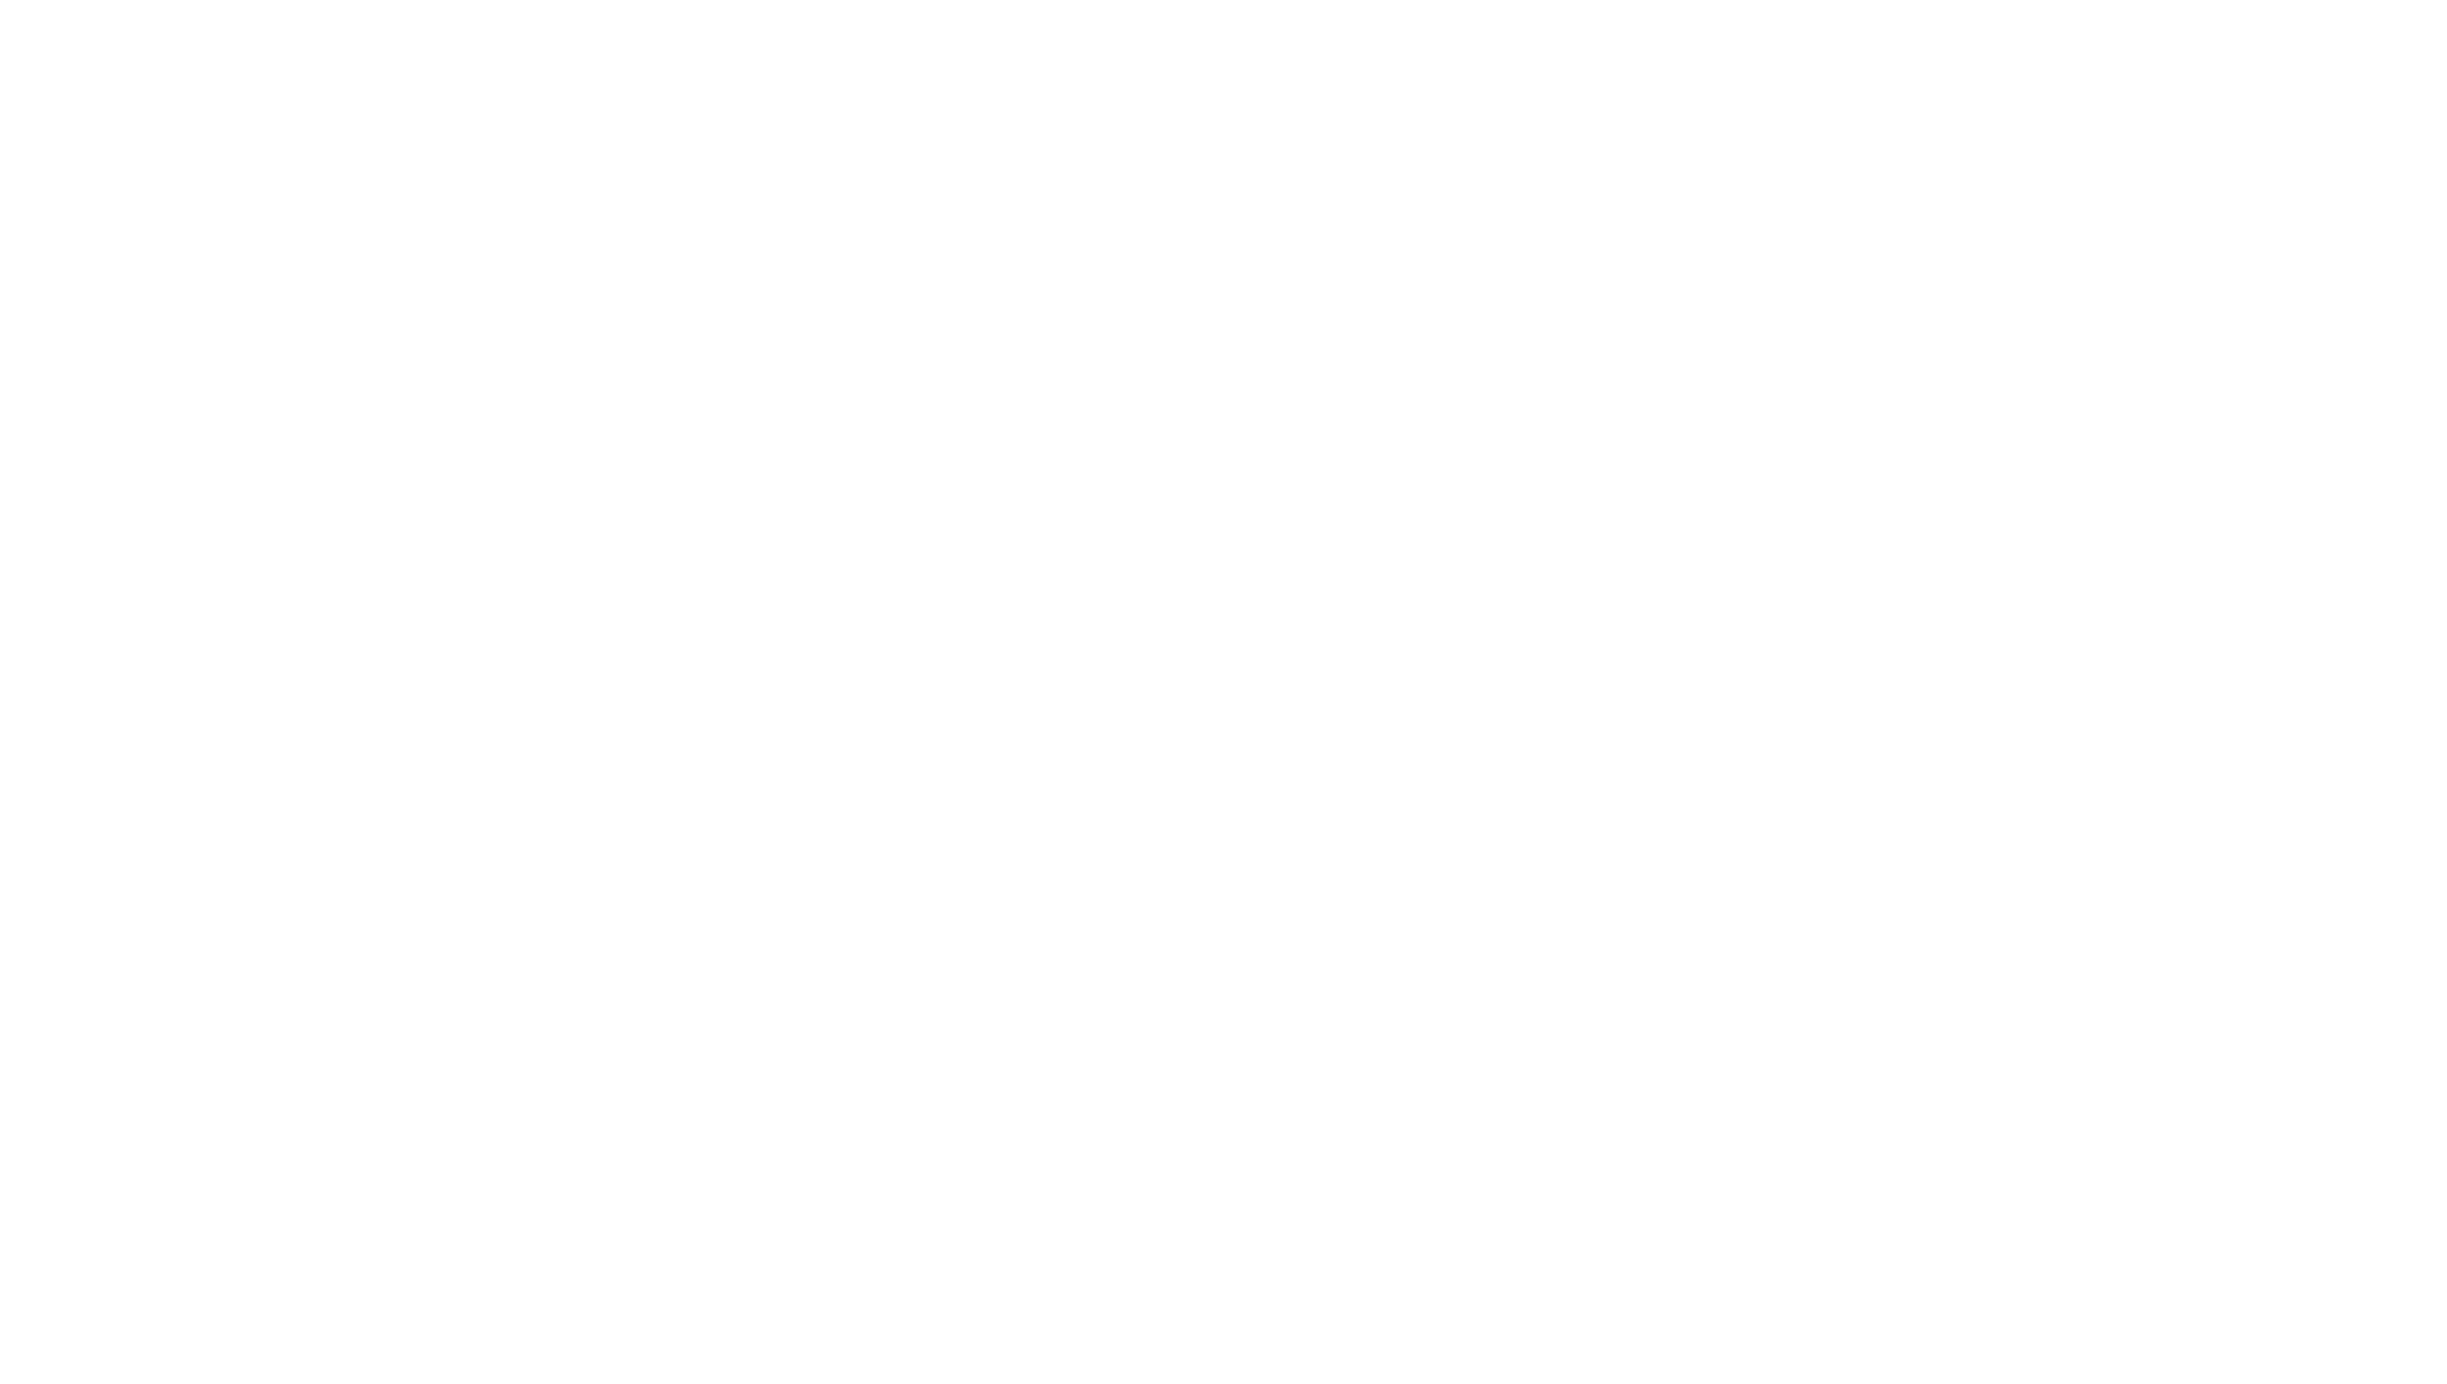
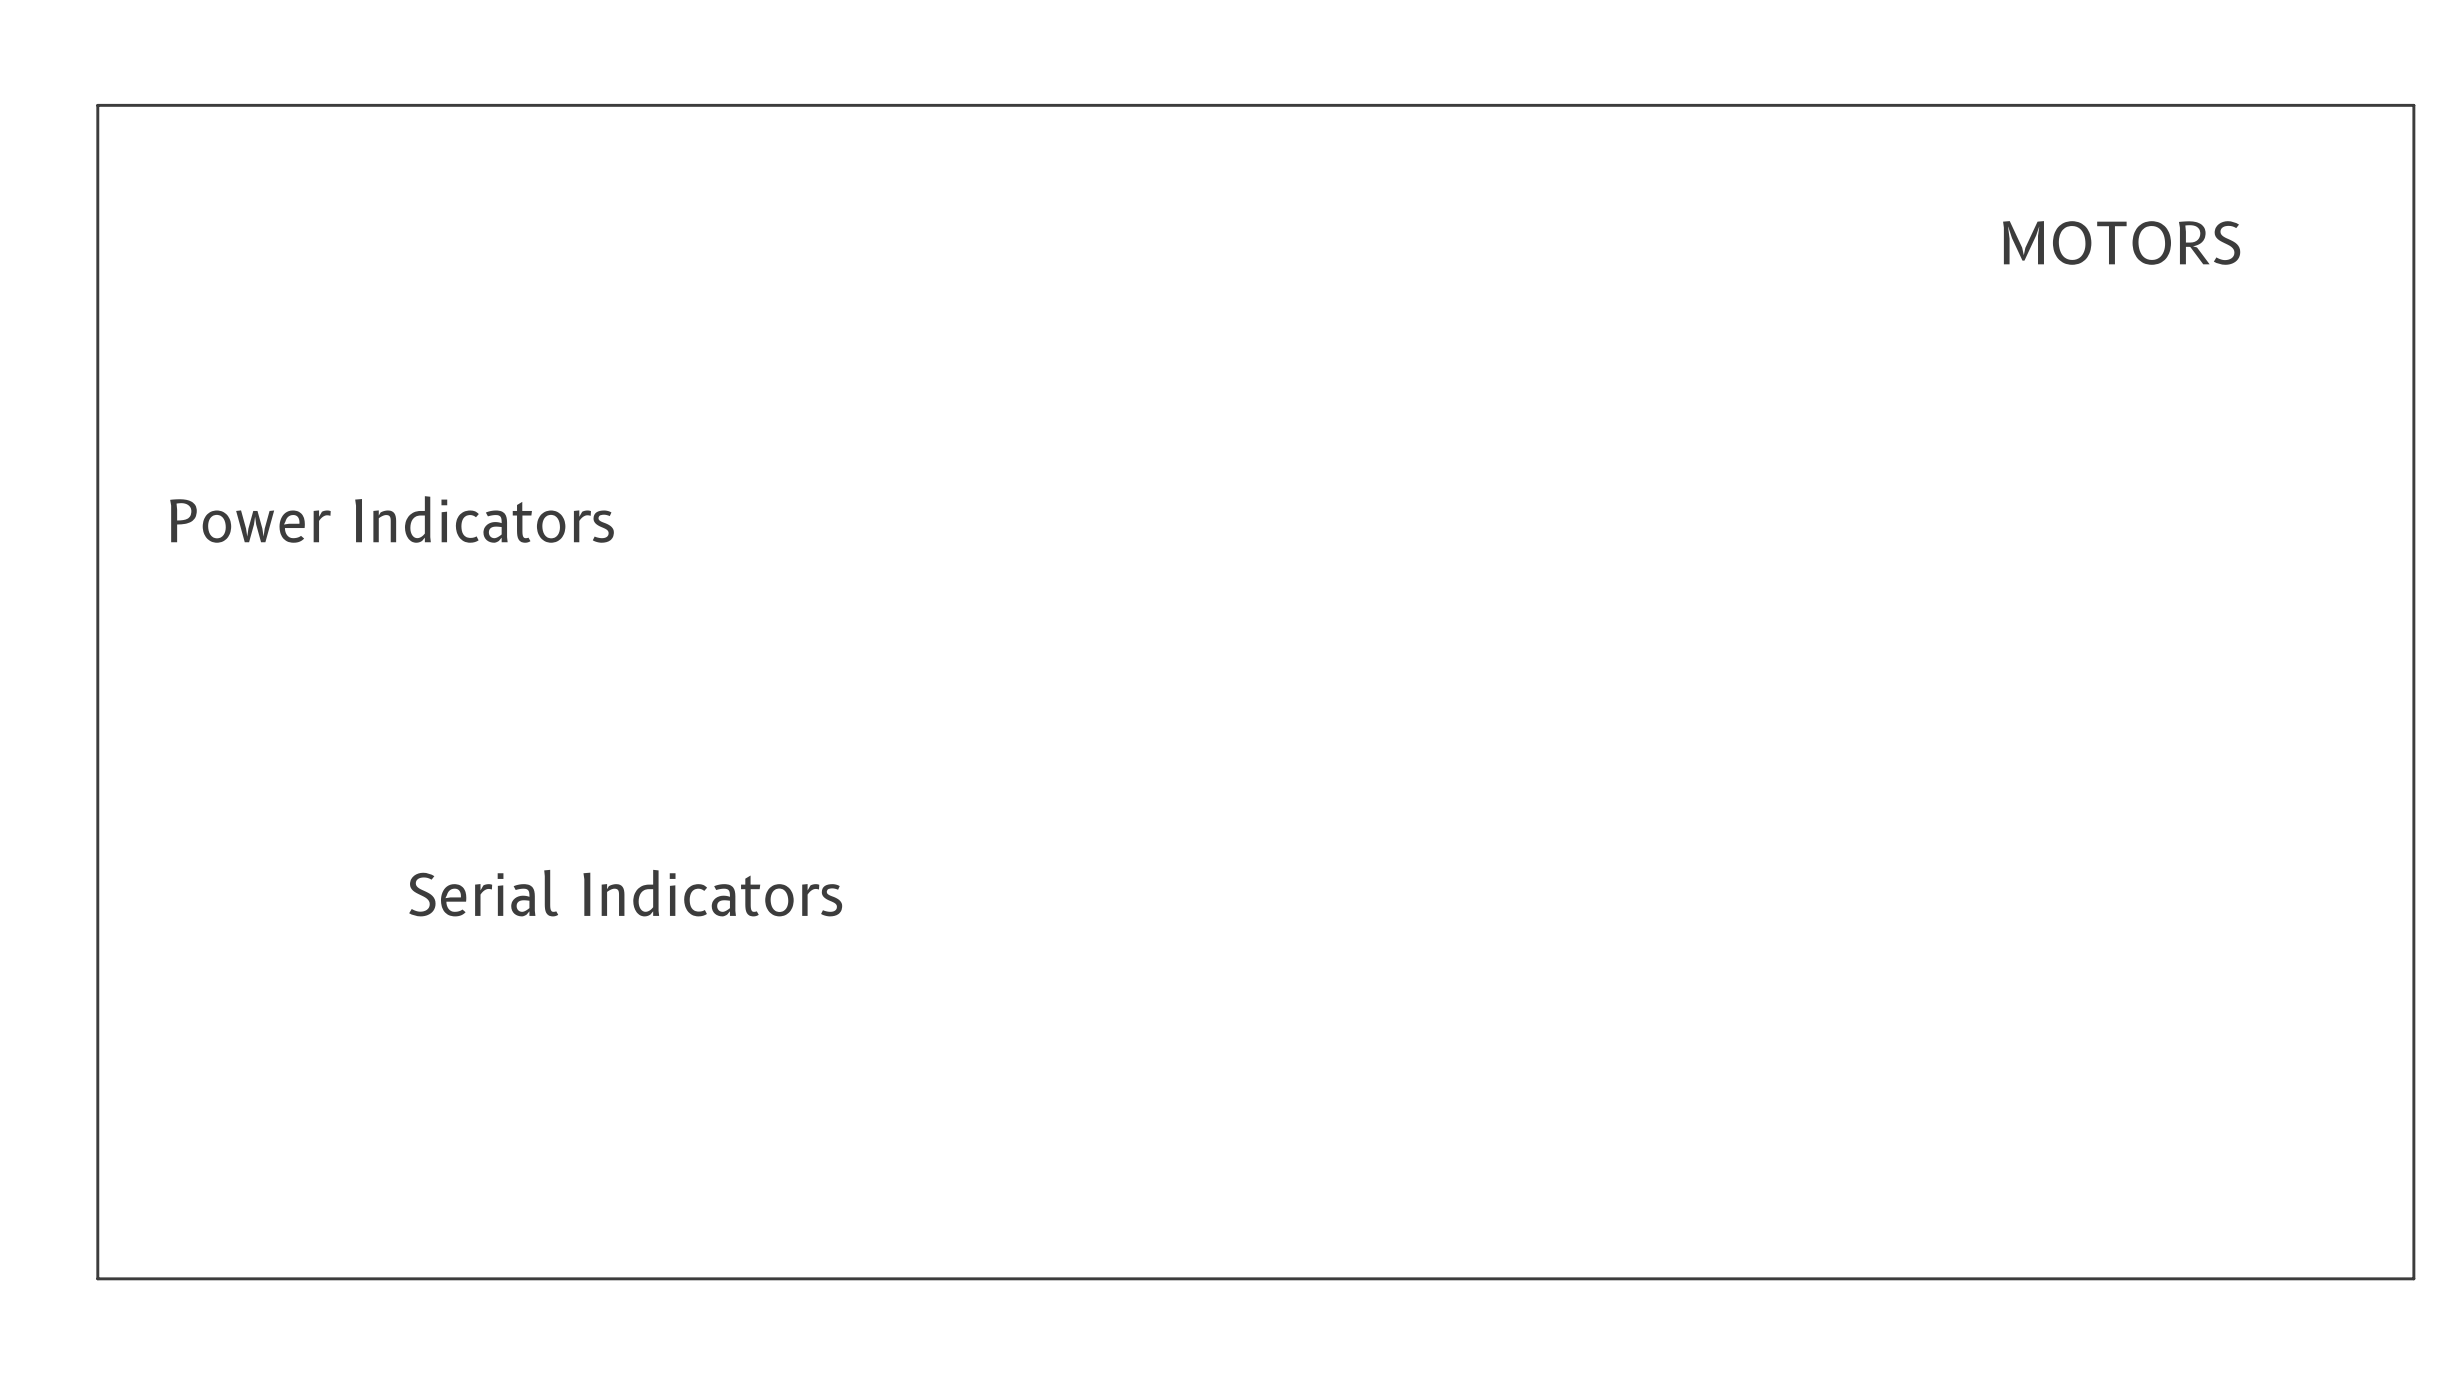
line: none -> (97, 105) (2413, 105) (2413, 1278) (97, 1278) (97, 105)
text: none -> MOTORS (2121, 242)
text: none -> Power Indicators (392, 519)
text: none -> Serial Indicators (625, 893)

